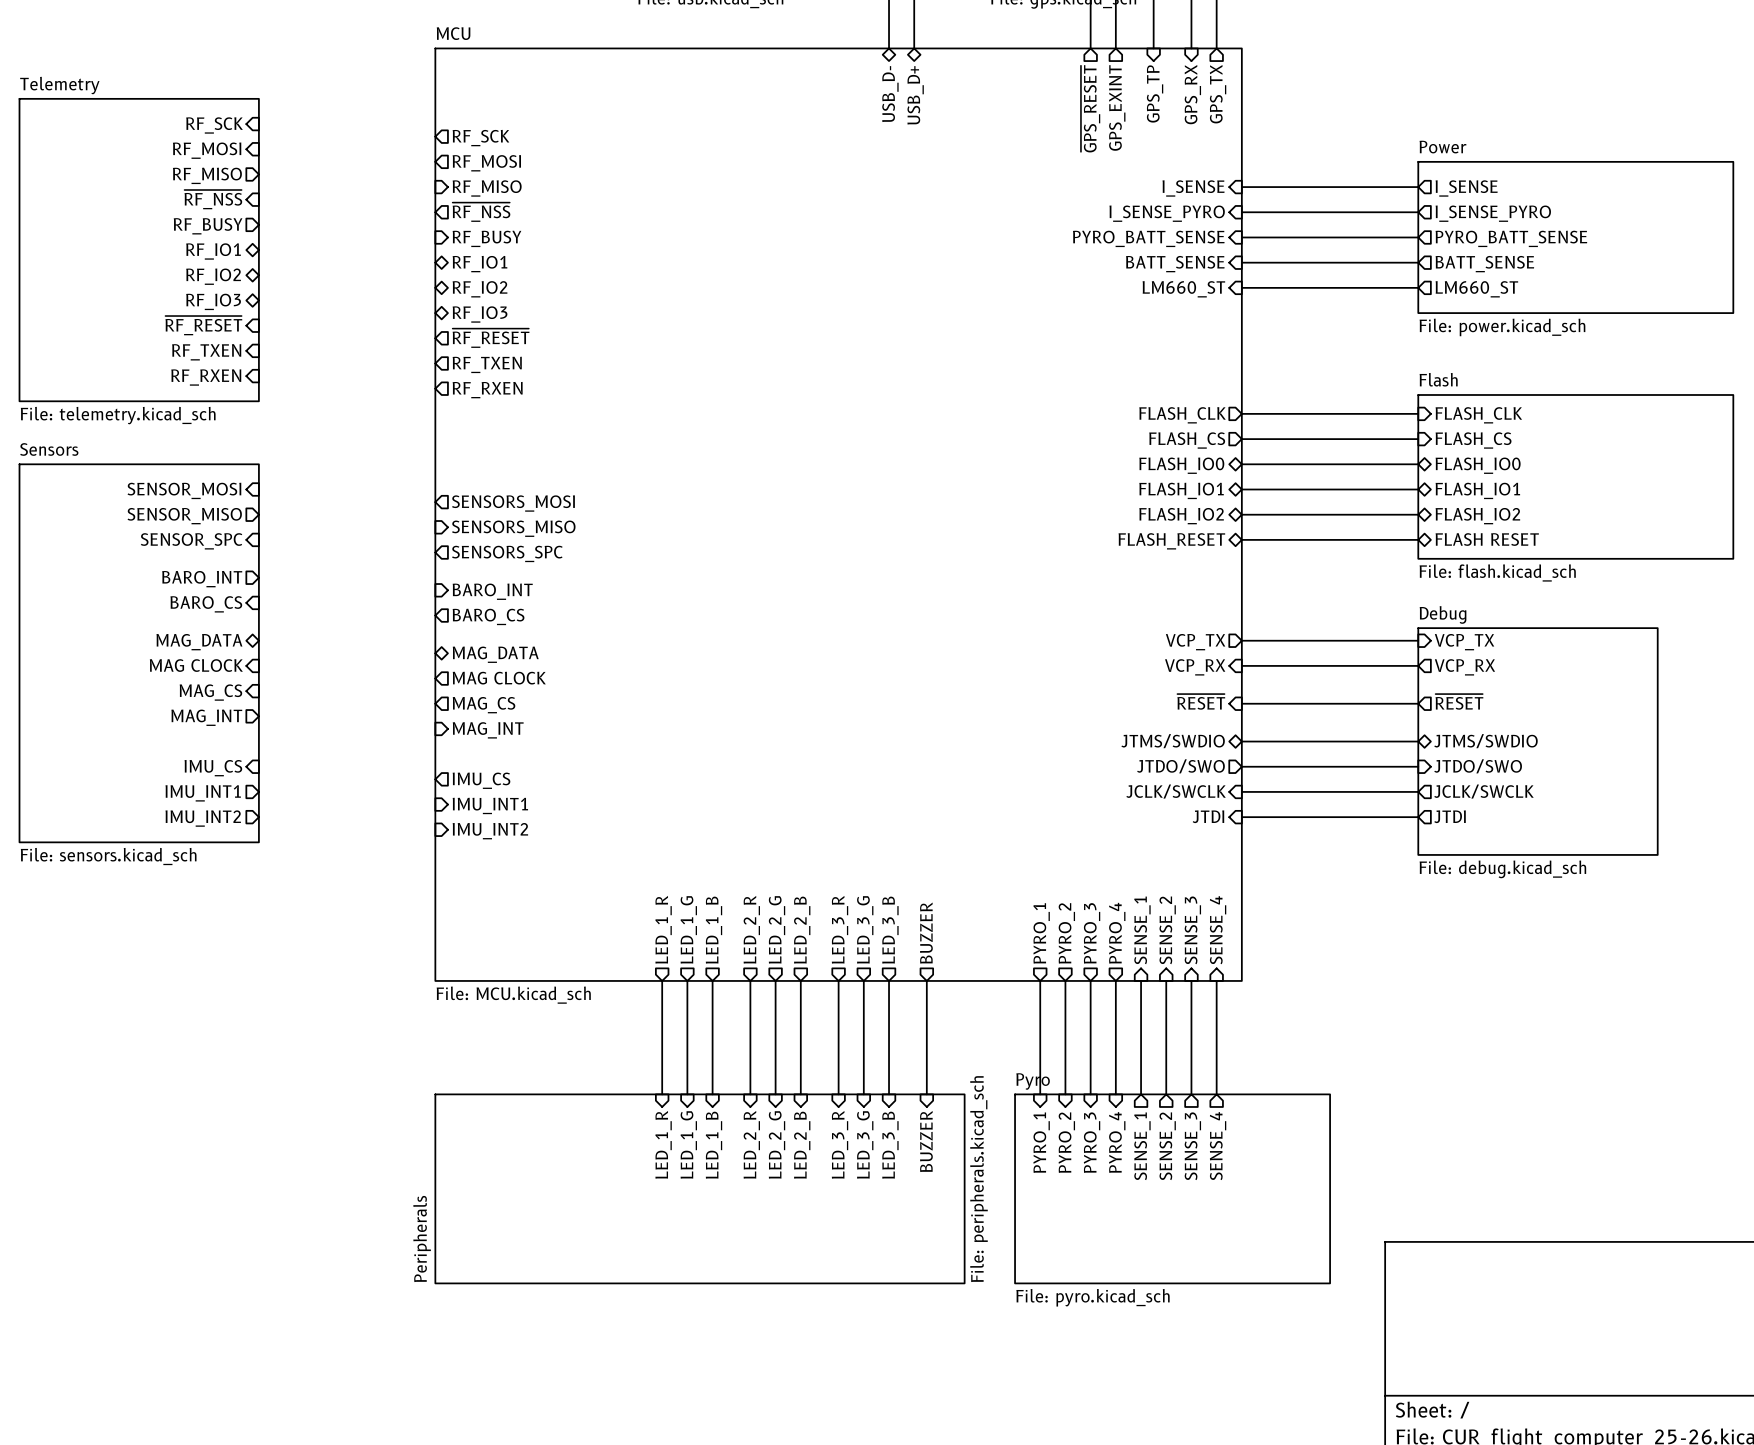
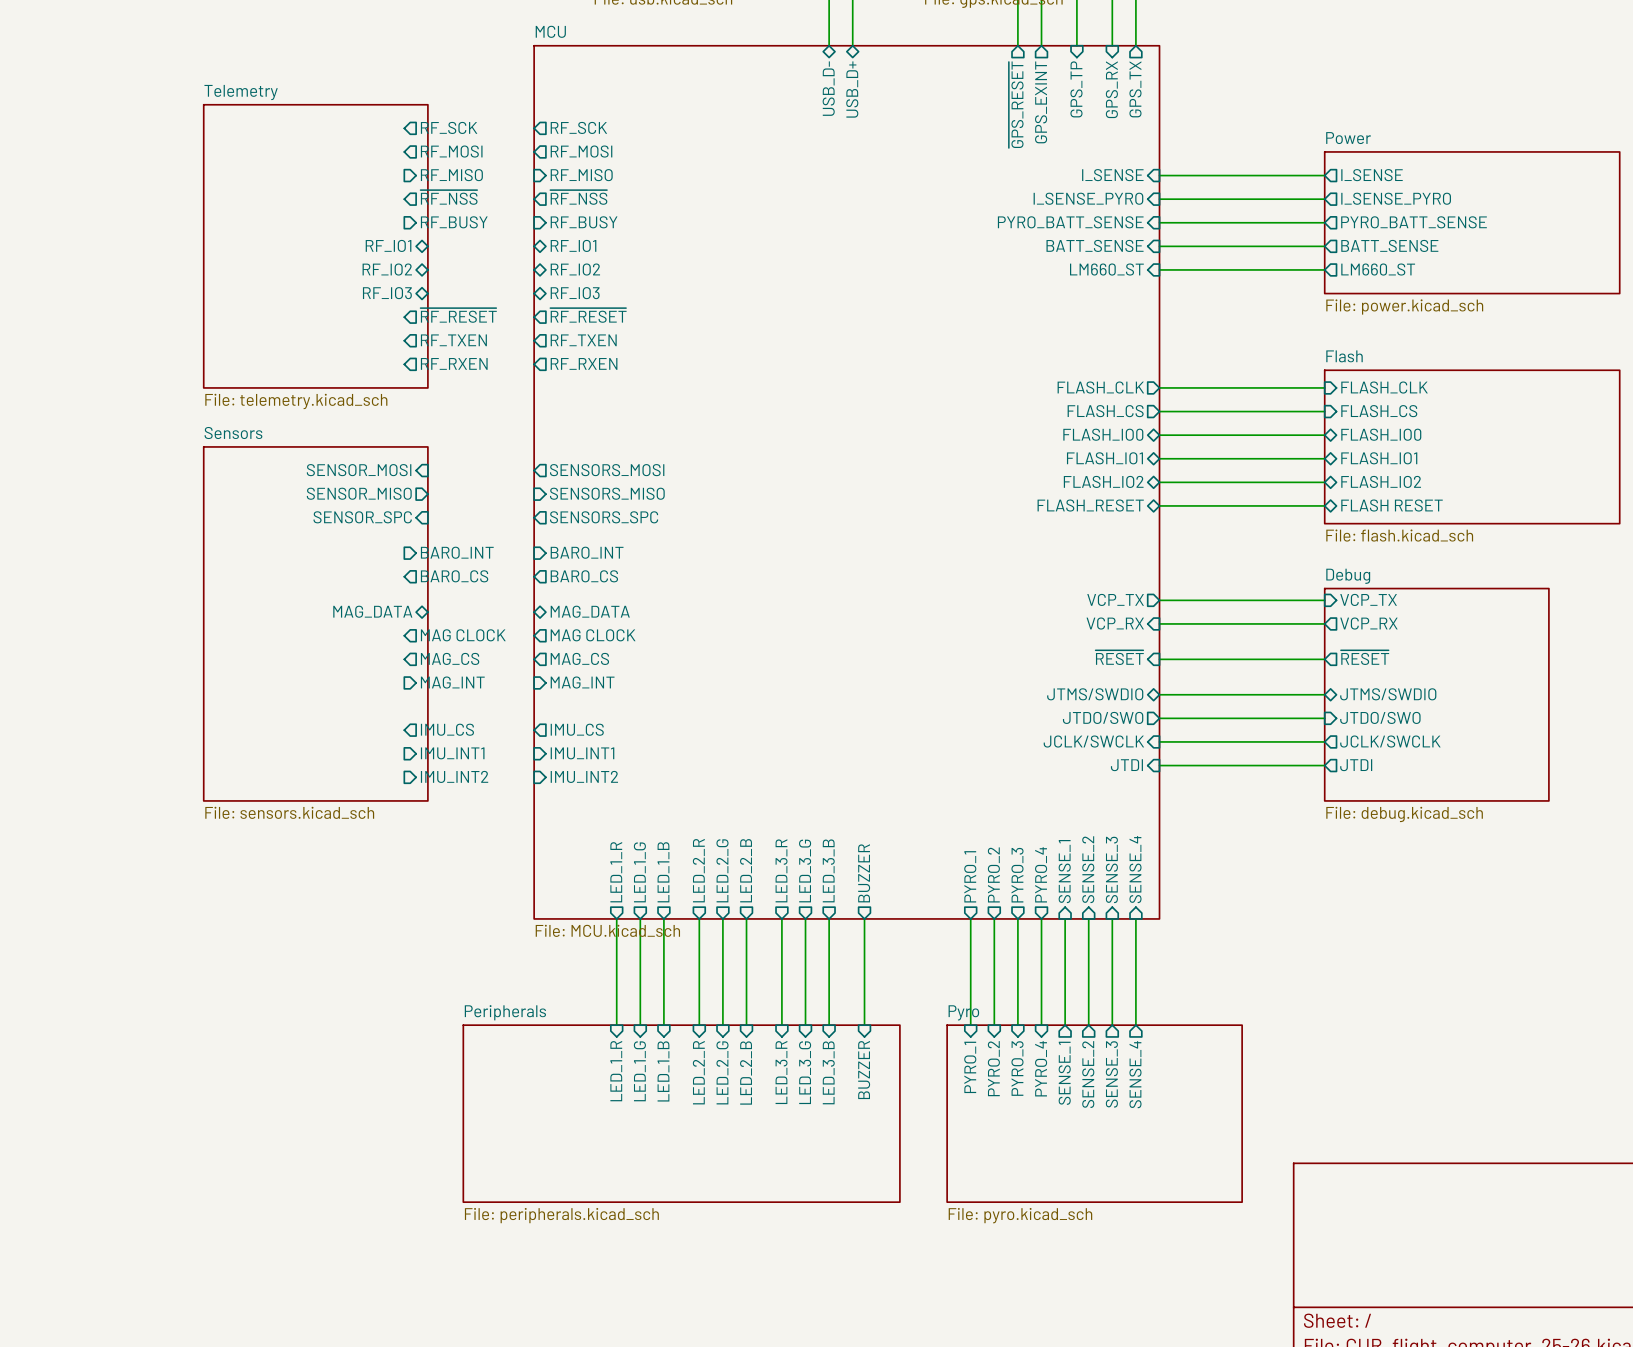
sheet pin: RF_SCK (214, 125) -> none
sheet pin: none -> RF_SCK (578, 127)
sheet pin: RF_MOSI (207, 150) -> none
sheet pin: none -> RF_MOSI (581, 151)
sheet pin: RF_MISO (207, 175) -> none
sheet pin: none -> RF_MISO (581, 175)
sheet pin: ~{RF_NSS} (213, 199) -> none
sheet pin: none -> ~{RF_NSS} (578, 197)
sheet pin: RF_BUSY (208, 226) -> none
sheet pin: none -> RF_BUSY (584, 222)
sheet Telemetry position: (139, 250) -> (315, 246)
sheet pin: RF_IO1 (213, 251) -> none
sheet pin rotation: 0° (479, 264) -> 180° (388, 245)
sheet pin position: RF_IO1 (479, 264) -> RF_IO1 (388, 245)
sheet pin: none -> RF_IO1 (573, 245)
sheet pin: RF_IO2 (213, 276) -> none
sheet pin rotation: 0° (480, 289) -> 180° (387, 269)
sheet pin position: RF_IO2 (480, 289) -> RF_IO2 (387, 269)
sheet pin: none -> RF_IO2 (575, 269)
sheet pin: RF_IO3 (213, 301) -> none
sheet pin rotation: 0° (480, 314) -> 180° (387, 293)
sheet pin position: RF_IO3 (480, 314) -> RF_IO3 (387, 293)
sheet pin: none -> RF_IO3 (575, 293)
sheet pin: ~{RF_RESET} (203, 325) -> none
sheet pin: none -> ~{RF_RESET} (588, 315)
sheet pin: RF_TXEN (206, 352) -> none
sheet pin: none -> RF_TXEN (583, 340)
sheet pin: RF_RXEN (206, 377) -> none
sheet pin: none -> RF_RXEN (584, 363)
sheet pin position: SENSOR_MOSI (184, 490) -> SENSOR_MOSI (359, 470)
sheet pin position: SENSORS_MOSI (513, 503) -> SENSORS_MOSI (607, 470)
sheet MCU: File: MCU.kicad_sch (838, 514) -> none
sheet MCU: none -> File: MCU.kicad_sch (846, 482)
sheet pin position: SENSOR_MISO (184, 516) -> SENSOR_MISO (359, 493)
sheet pin position: SENSORS_MISO (513, 528) -> SENSORS_MISO (607, 493)
sheet pin position: SENSOR_SPC (191, 541) -> SENSOR_SPC (362, 517)
sheet pin position: SENSORS_SPC (507, 553) -> SENSORS_SPC (604, 517)
sheet pin: BARO_INT (202, 579) -> none
sheet pin: none -> BARO_INT (587, 552)
sheet pin: BARO_CS (206, 604) -> none
sheet pin: none -> BARO_CS (584, 576)
sheet pin: MAG_DATA (199, 642) -> none
sheet Sensors position: (139, 653) -> (315, 623)
sheet pin rotation: 0° (495, 654) -> 180° (372, 611)
sheet pin position: MAG_DATA (495, 654) -> MAG_DATA (372, 611)
sheet pin: none -> MAG_DATA (590, 611)
sheet pin: MAG CLOCK (196, 665) -> none
sheet pin: none -> MAG CLOCK (593, 635)
sheet pin: MAG_CS (210, 692) -> none
sheet pin: none -> MAG_CS (579, 658)
sheet pin: MAG_INT (206, 717) -> none
sheet pin: none -> MAG_INT (582, 682)
sheet pin: IMU_CS (213, 768) -> none
sheet pin: none -> IMU_CS (577, 729)
sheet pin: IMU_INT1 (203, 793) -> none
sheet pin: none -> IMU_INT1 (582, 753)
sheet pin: IMU_INT2 (203, 818) -> none
sheet pin: none -> IMU_INT2 (584, 776)
sheet Peripherals: File: peripherals.kicad_sch (699, 1188) -> none
sheet Peripherals: none -> File: peripherals.kicad_sch (681, 1113)

